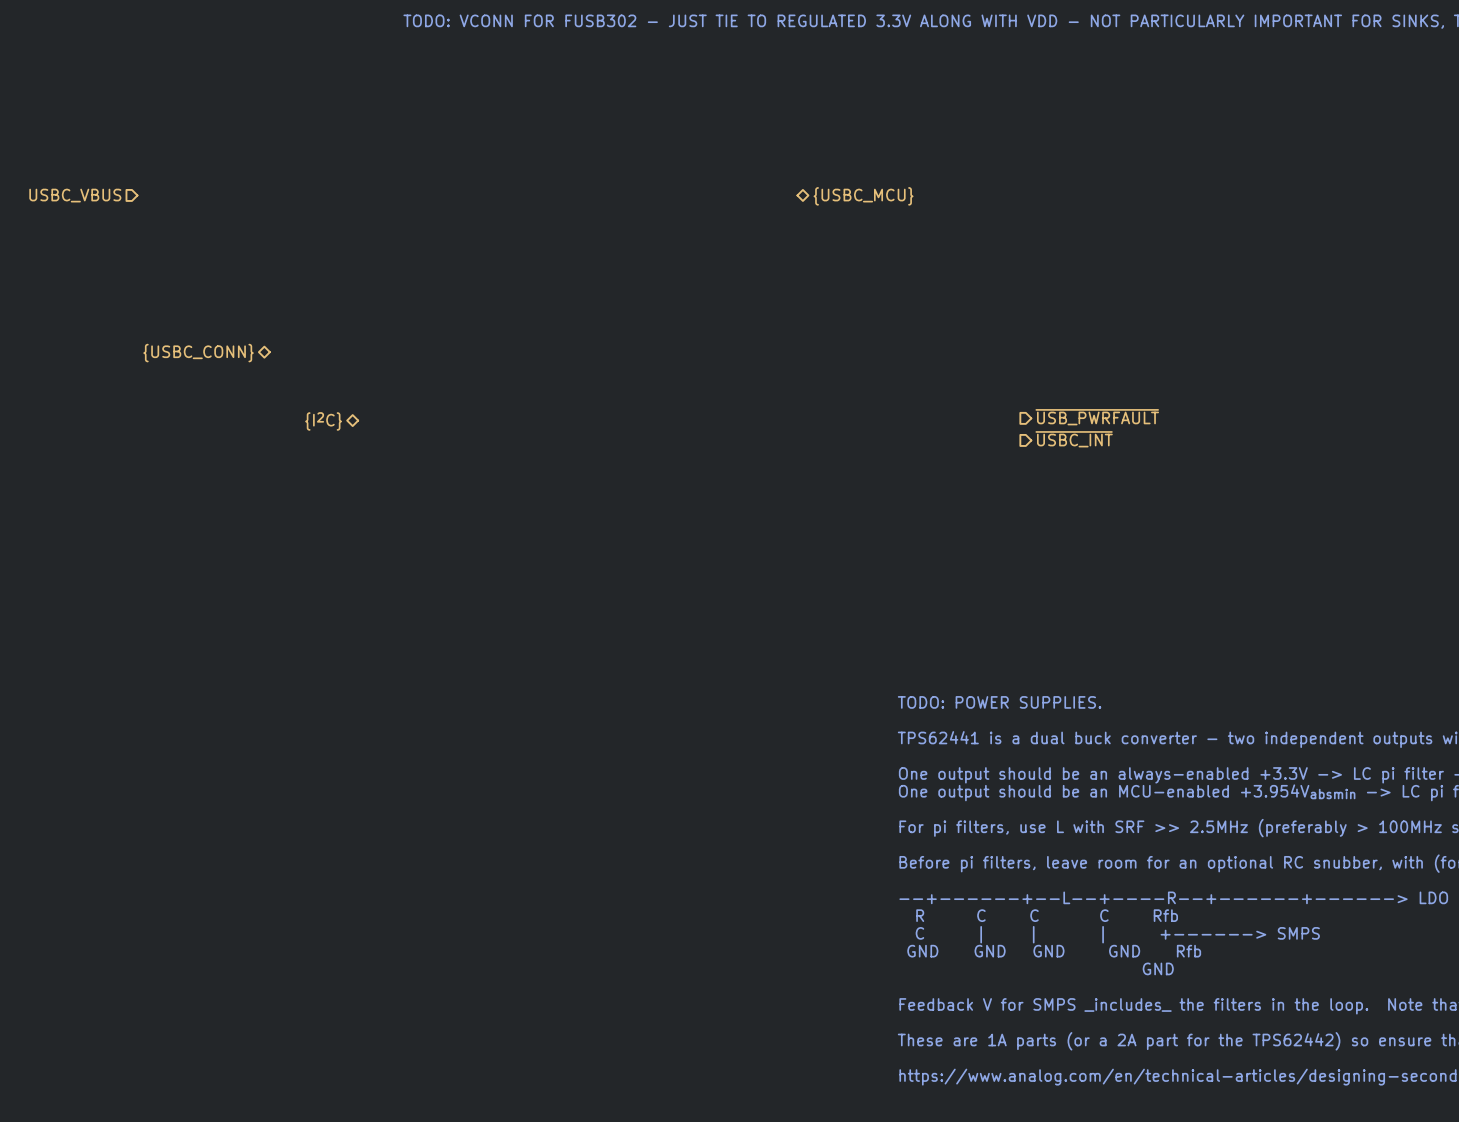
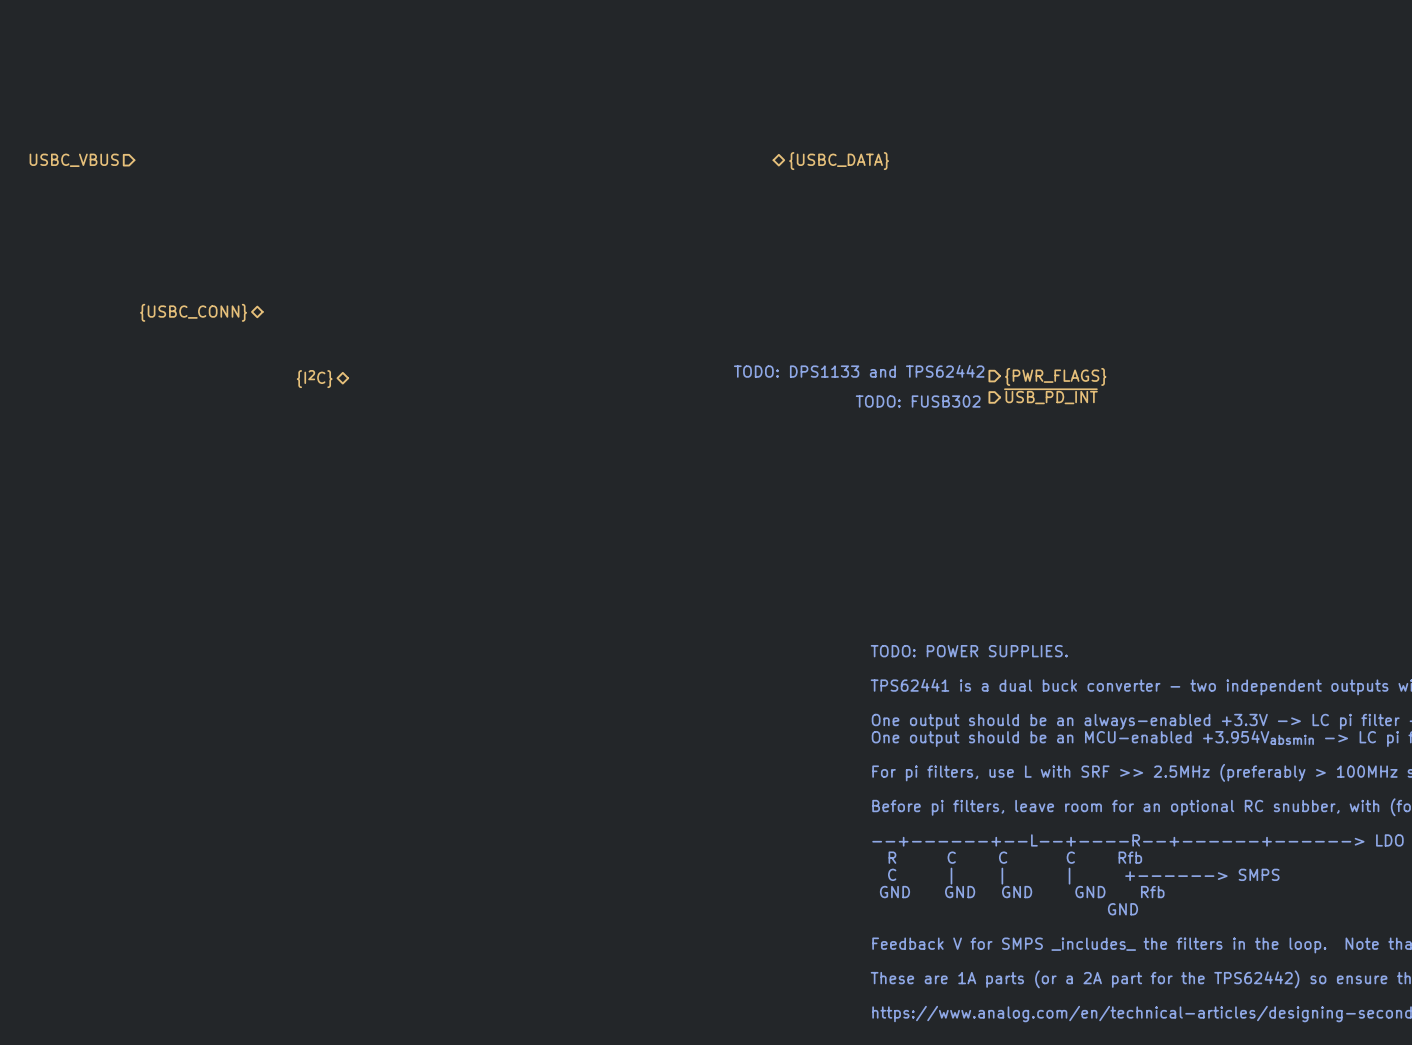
hierarchical label: {USBC_MCU} (863, 196) -> {USBC_DATA} (839, 161)
text: none -> TODO: DPS1133 and TPS62442 (859, 371)
hierarchical label: ~{USB_PWRFAULT} (1097, 417) -> {PWR_FLAGS} (1055, 376)
hierarchical label: ~{USBC_INT} (1074, 439) -> ~{USB_PD_INT} (1050, 396)
text: none -> TODO: FUSB302 (918, 401)

